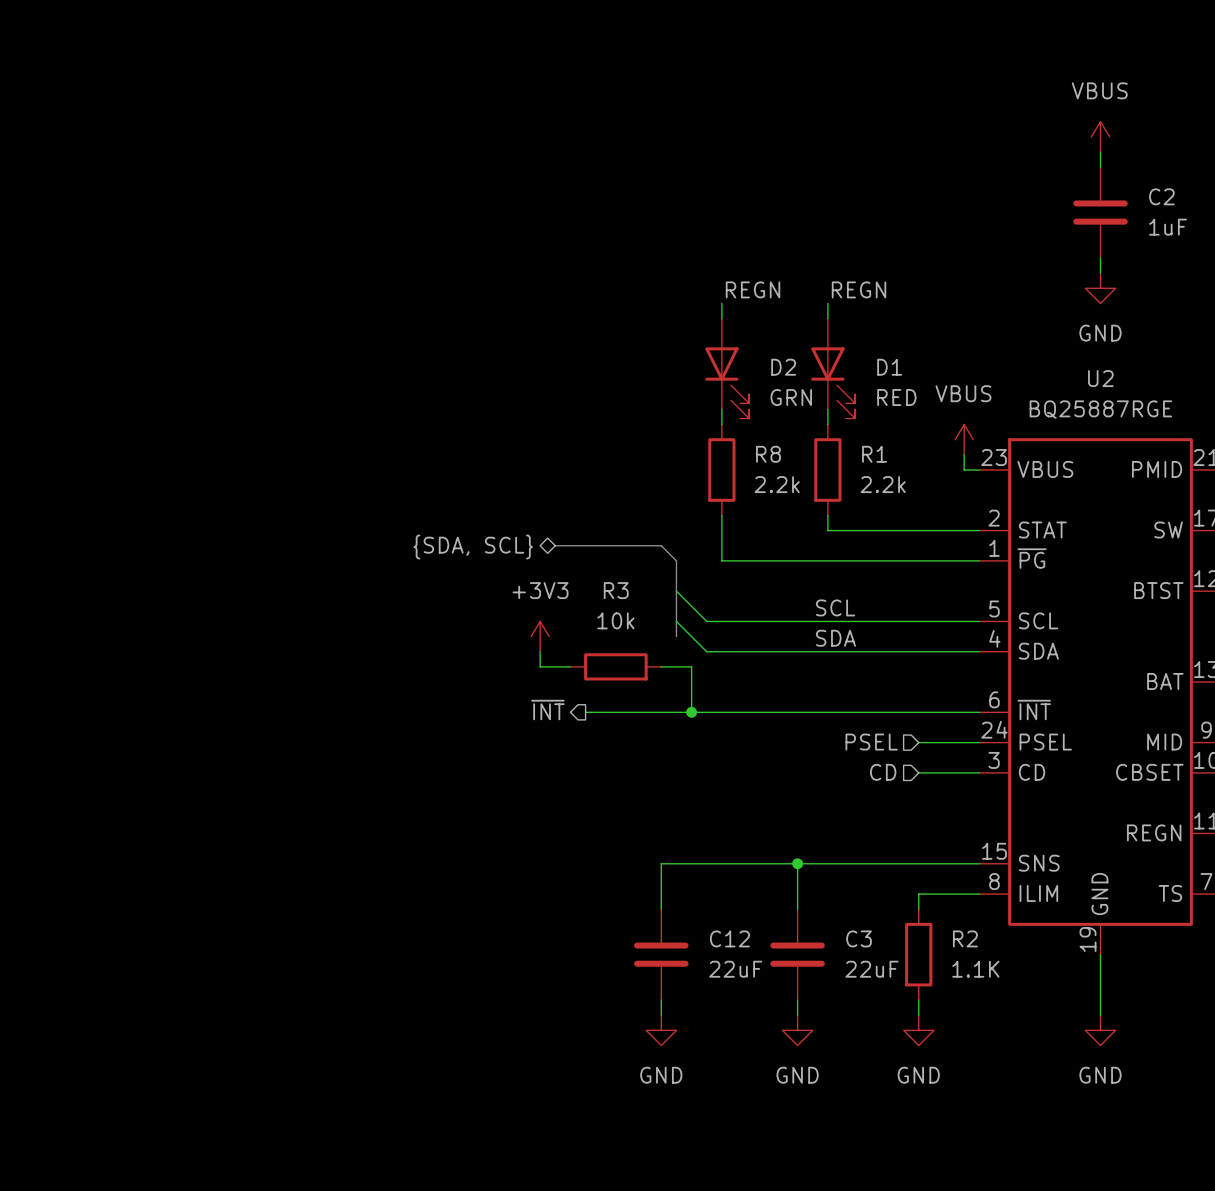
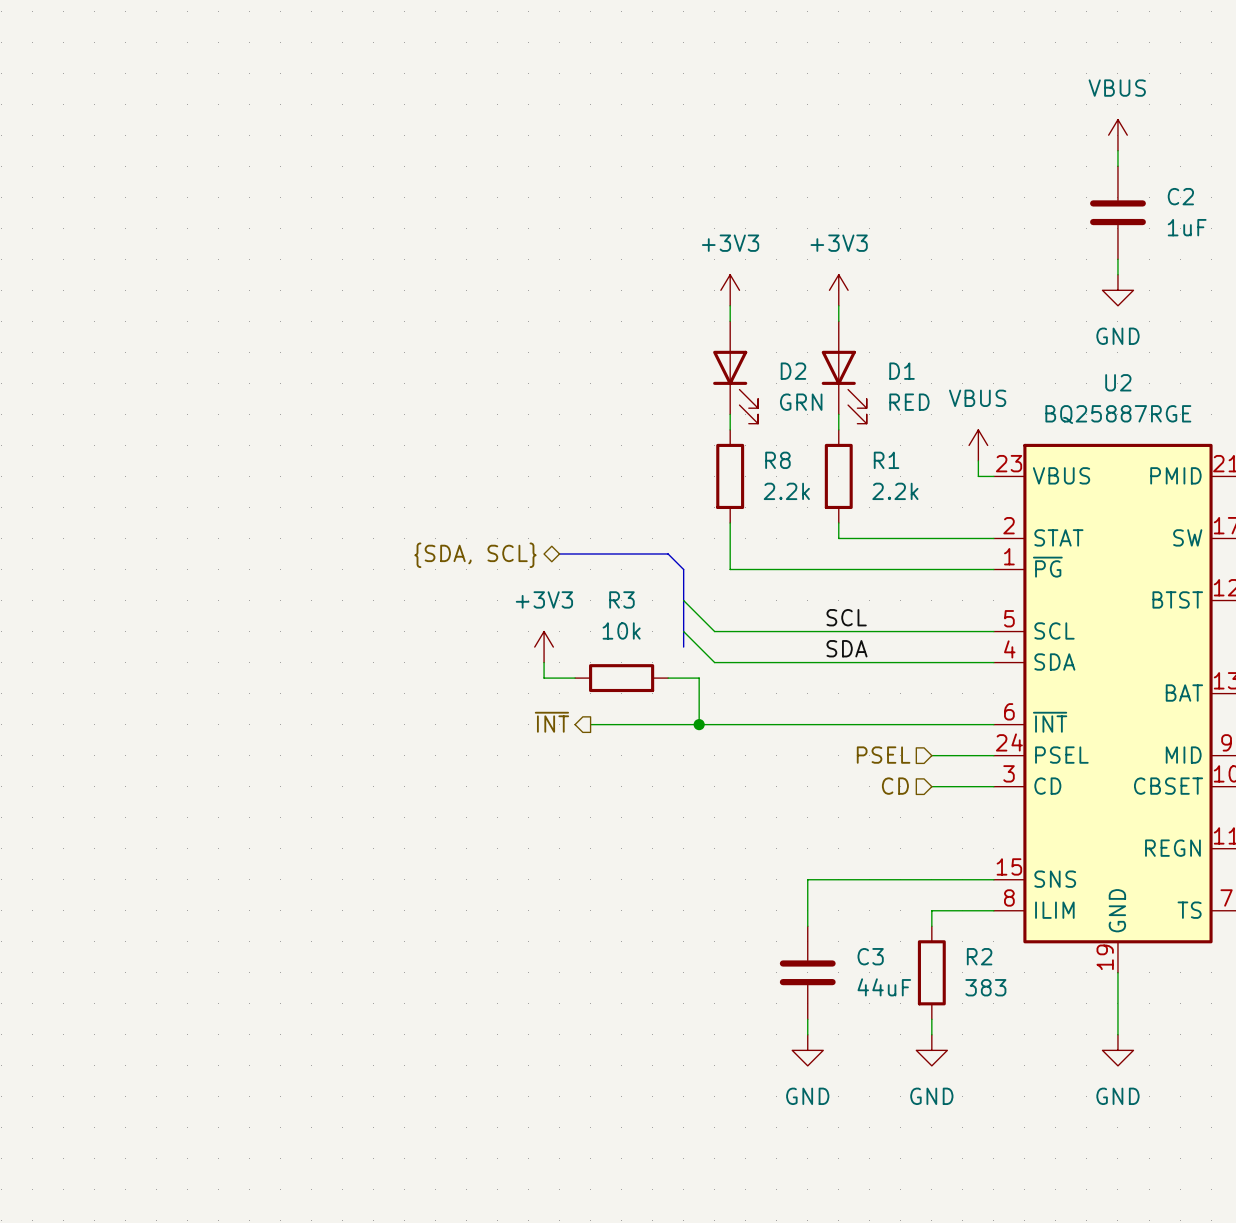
power symbol: none -> +3V3 (730, 290)
power symbol: none -> +3V3 (838, 290)
label: REGN (753, 289) -> none
label: REGN (859, 289) -> none
wire: (797, 863) (661, 863) (661, 909) -> none
junction: (797, 863) -> none
C12: 22uF (661, 954) -> none
C3 value: 22uF (872, 969) -> 44uF (884, 987)
R2 value: 1.1K (975, 969) -> 383 (985, 987)
wire: (661, 1000) (661, 1015) -> none
power symbol: GND (661, 1030) -> none

